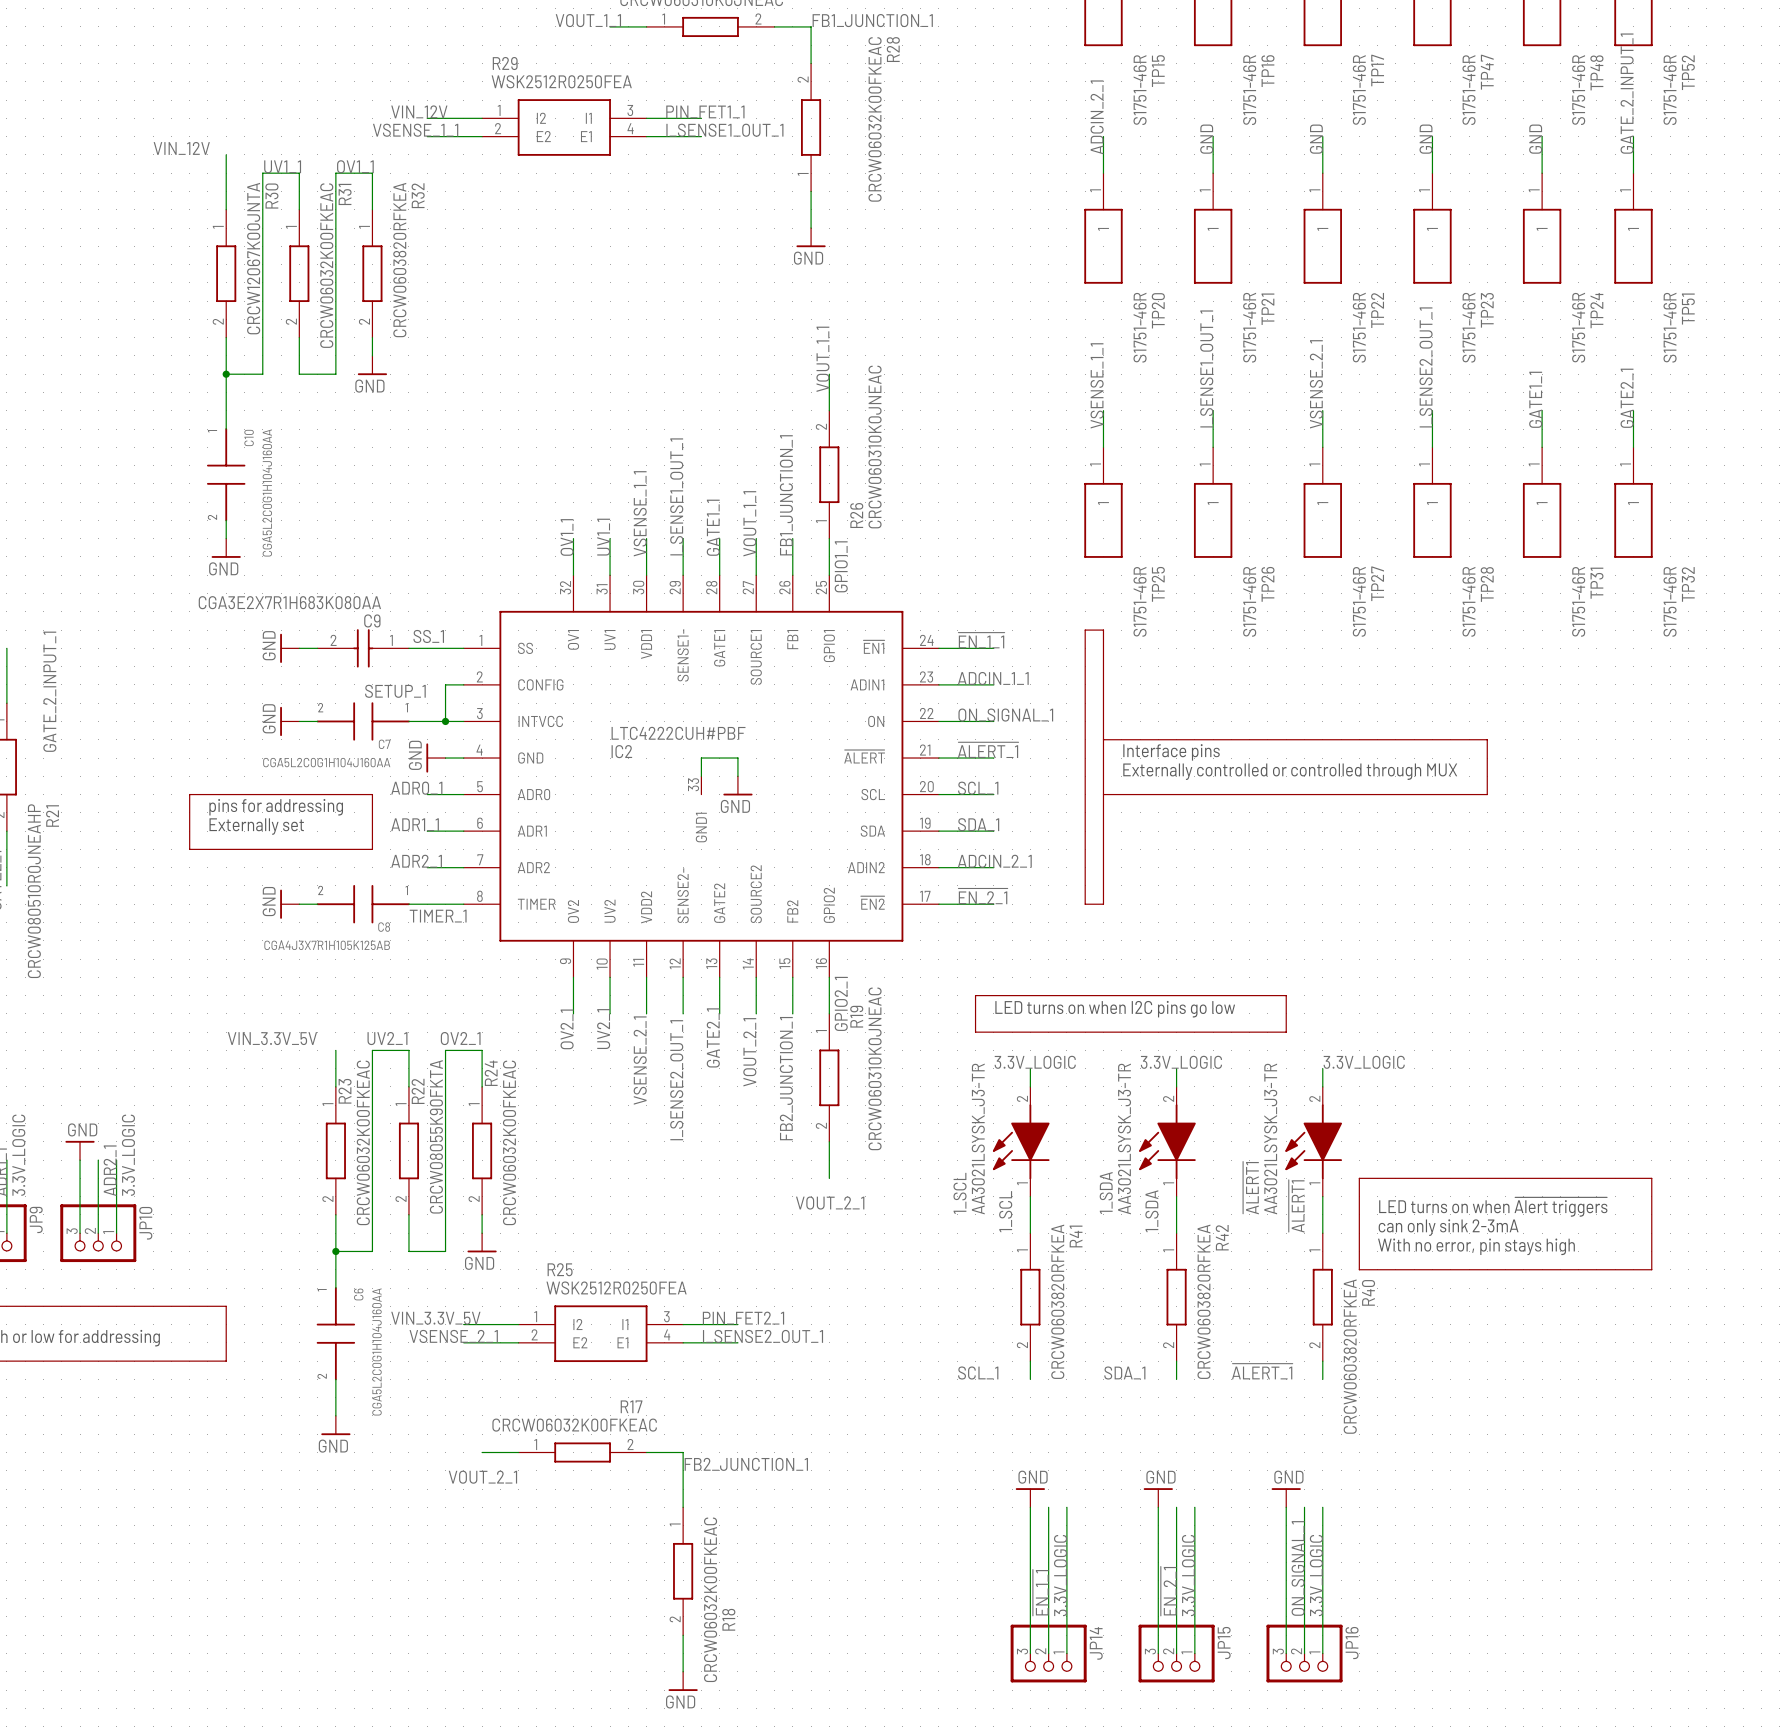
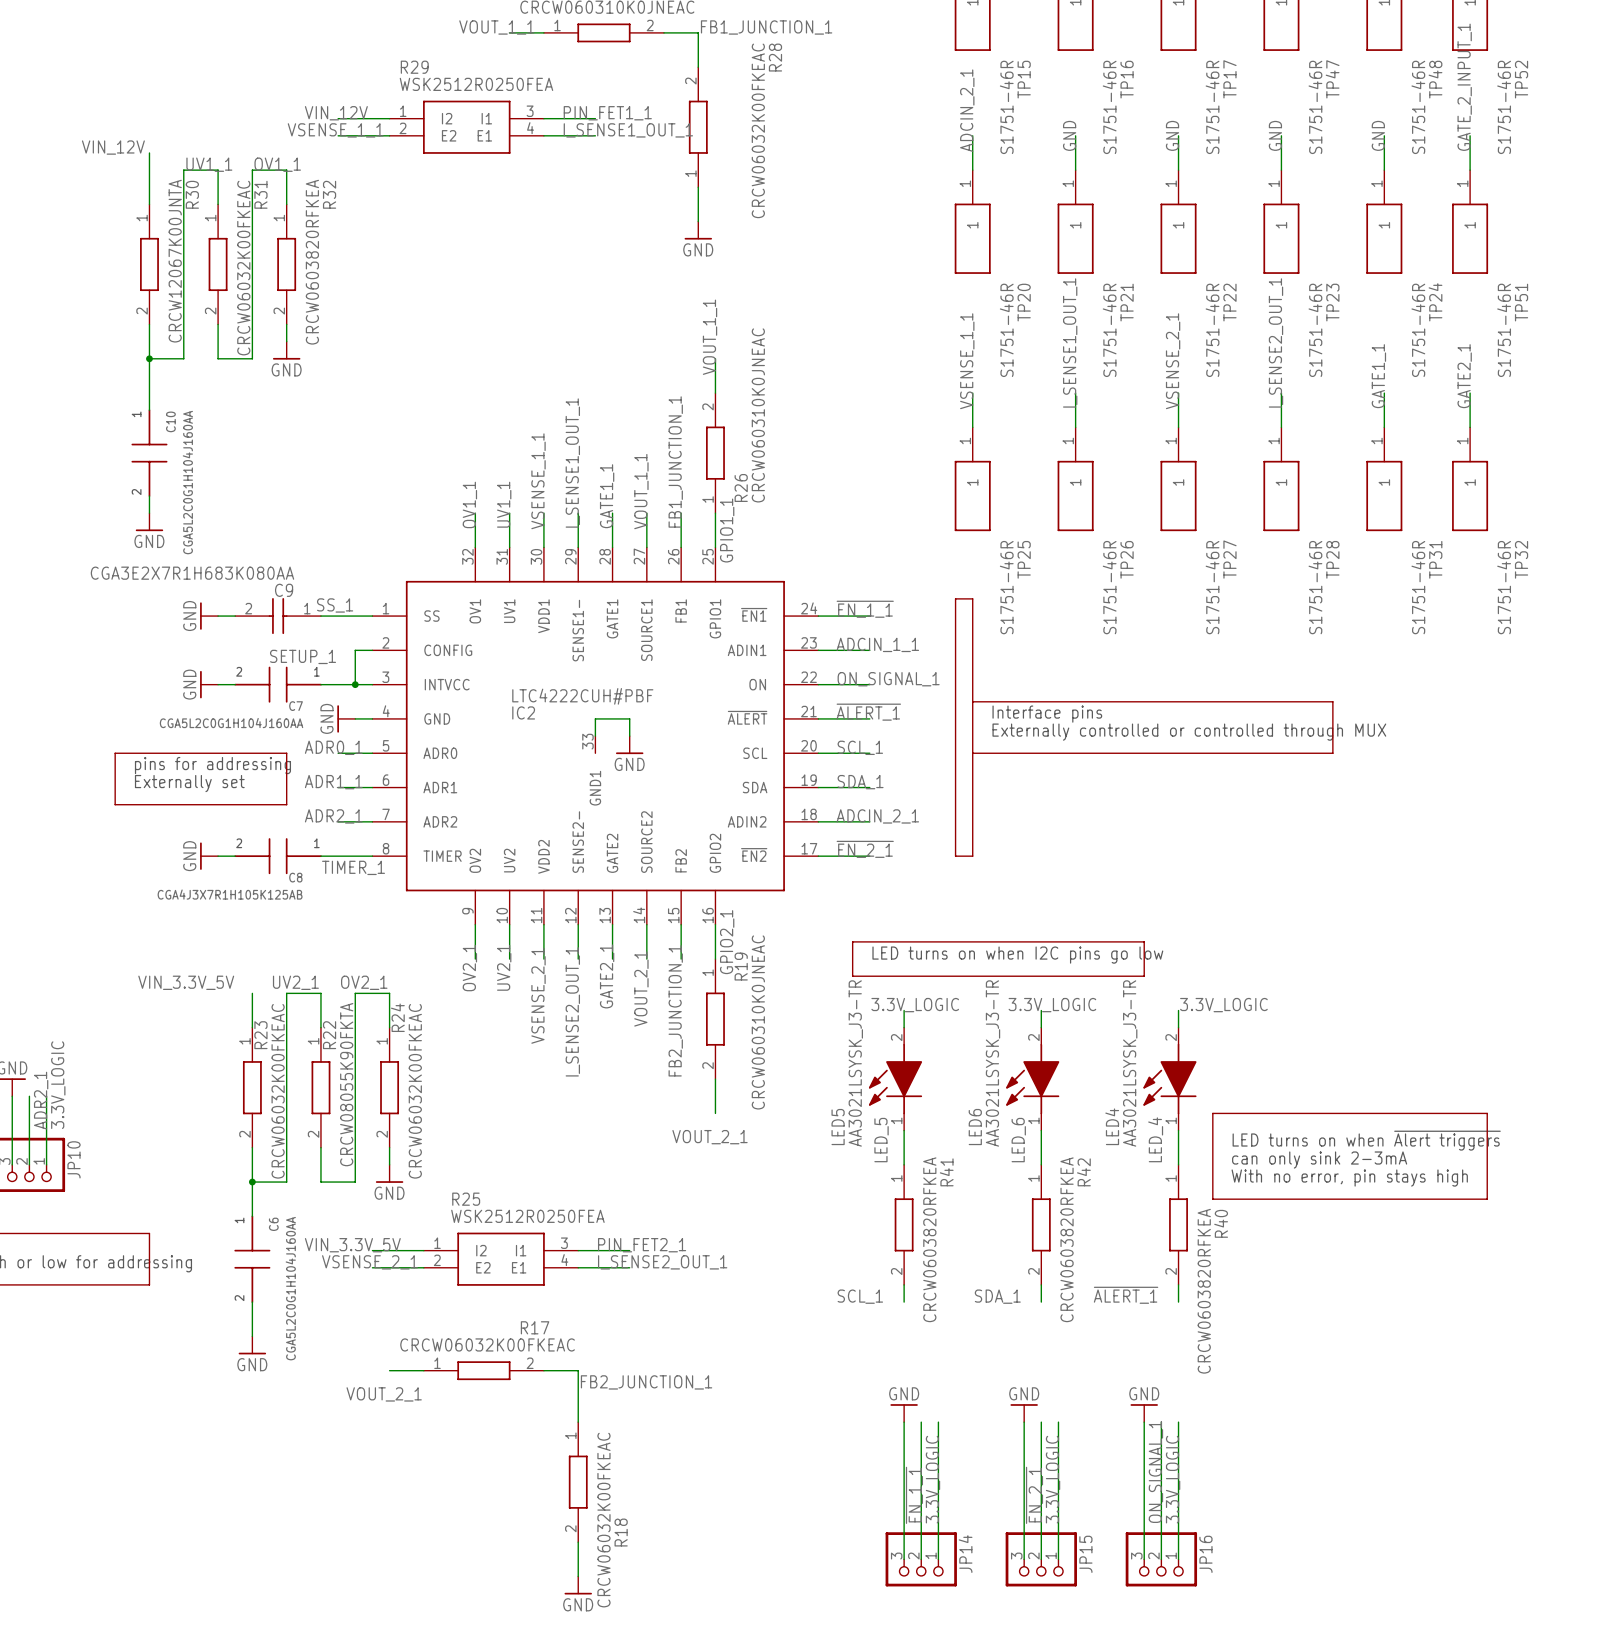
~{ALERT1} name: ~{ALERT1} (1250, 1187) -> LED4 (1112, 1126)
1_SDA name: 1_SDA (1106, 1192) -> LED6 (975, 1127)
1_SCL name: 1_SCL (960, 1193) -> LED5 (838, 1127)
label: ~{ALERT1} (1296, 1206) -> LED_4 (1155, 1139)
label: 1_SCL (1005, 1211) -> LED_5 (881, 1140)
label: 1_SDA (1151, 1211) -> LED_6 (1018, 1140)

